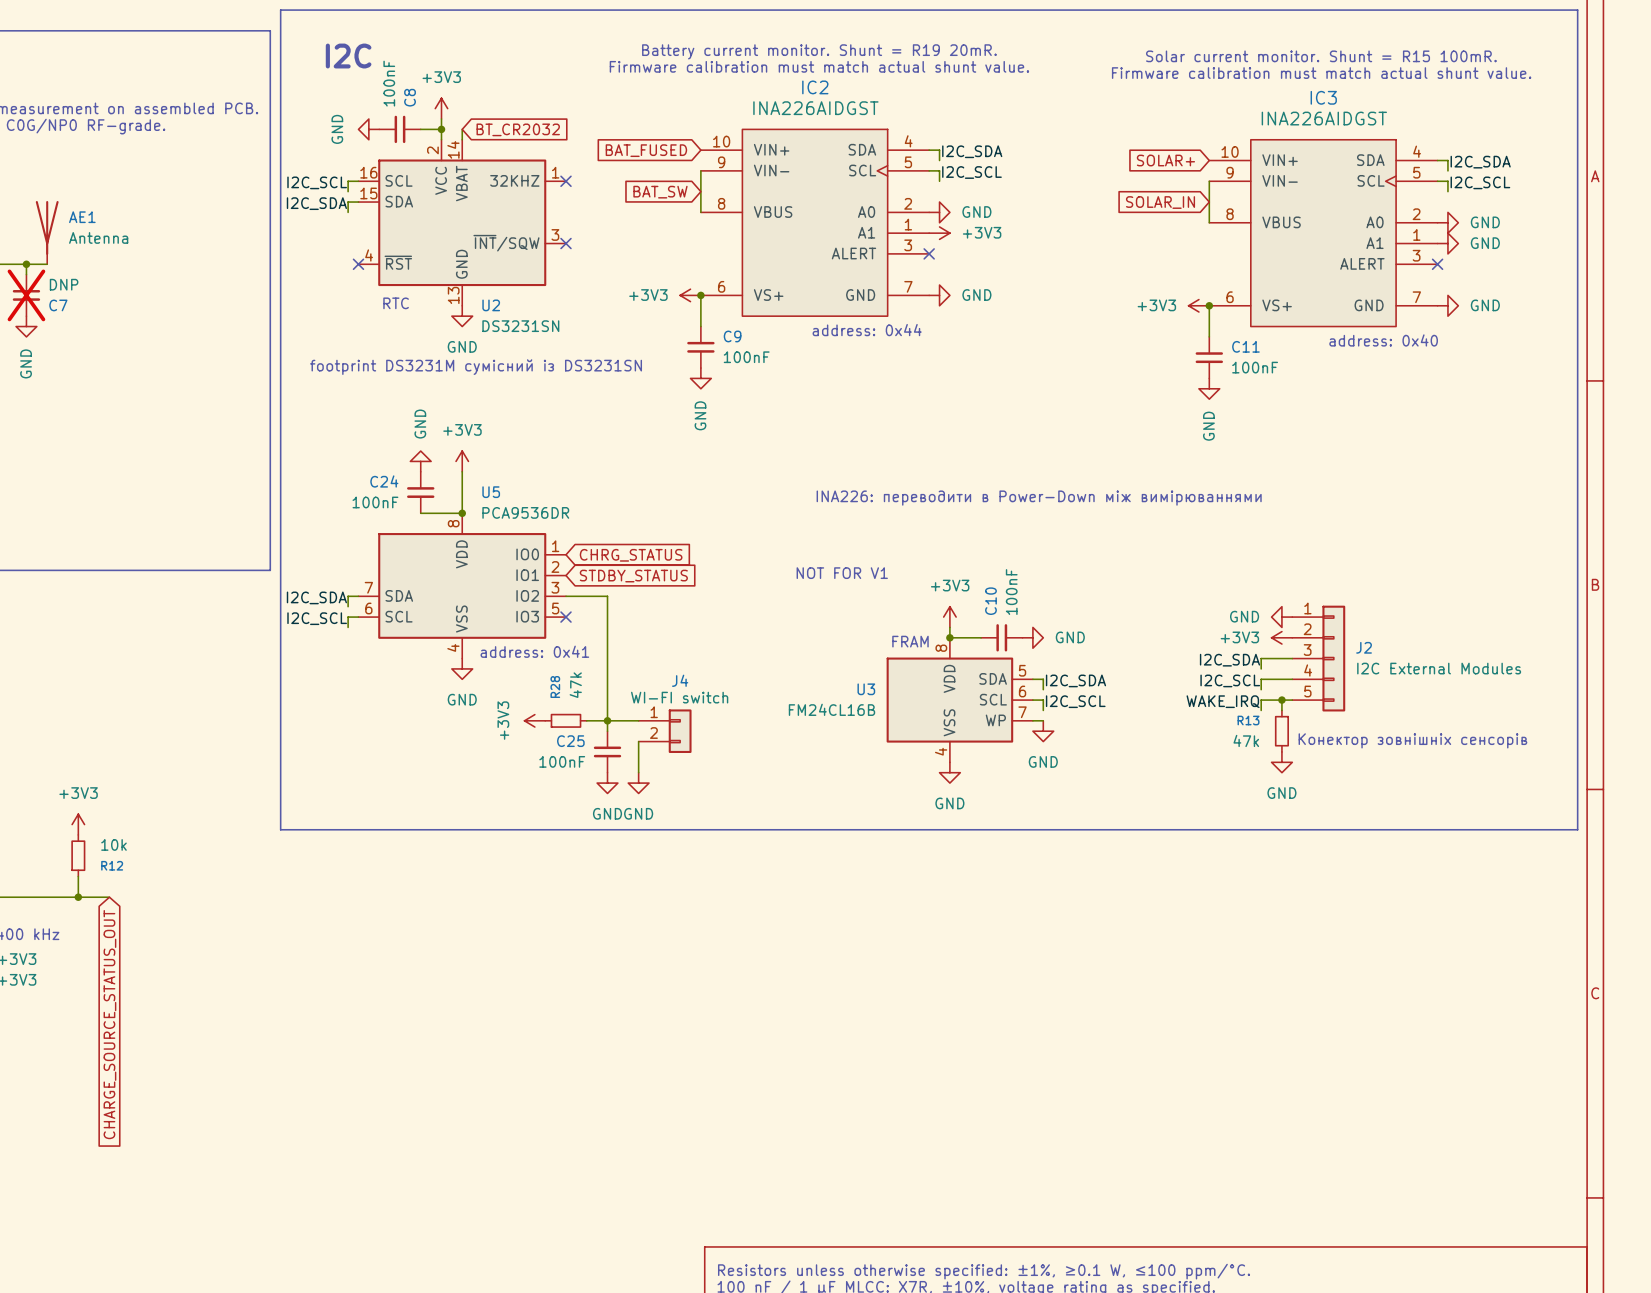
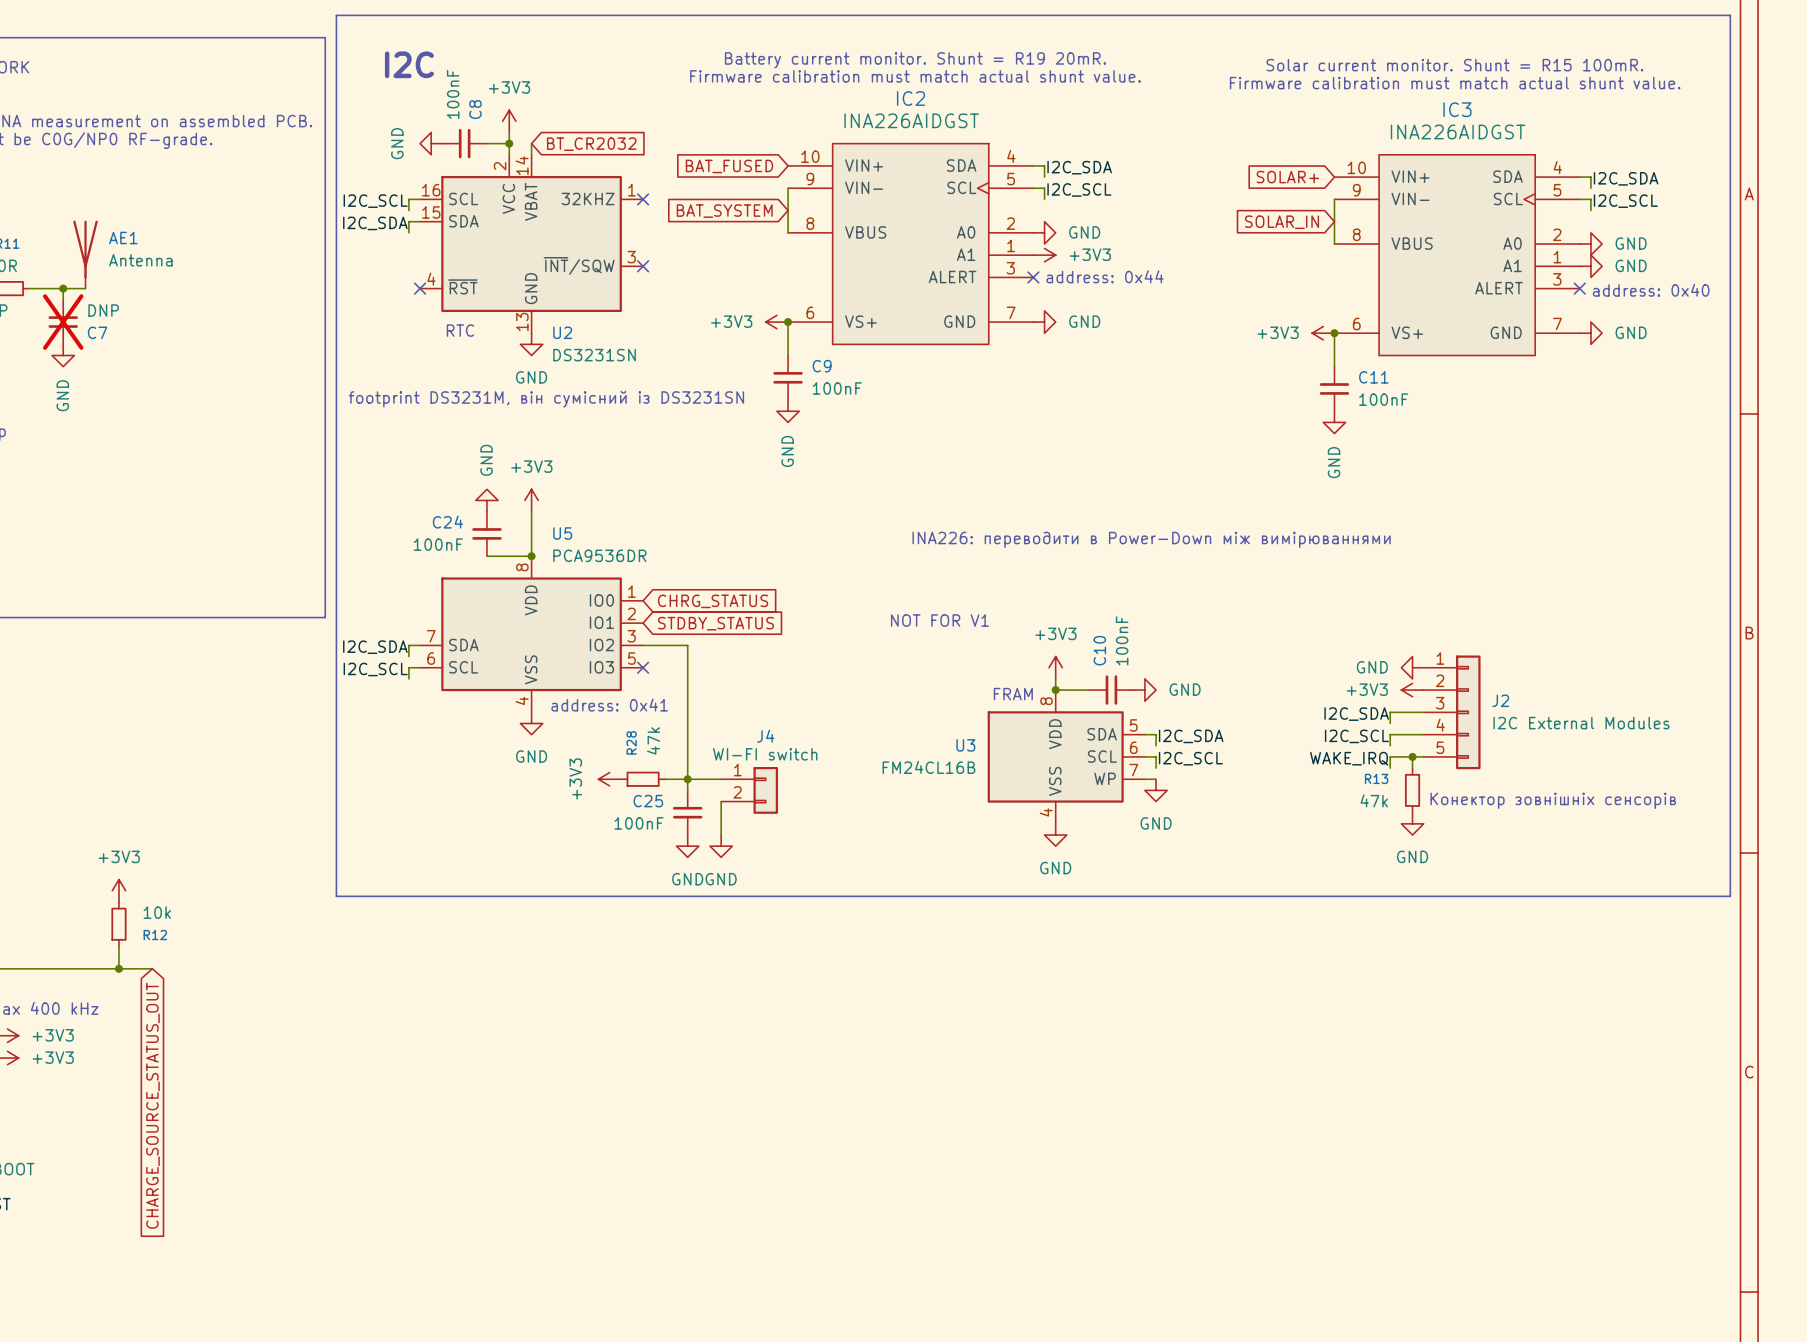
global label: BAT_SW (660, 192) -> BAT_SYSTEM (724, 211)
text position: address: 0x44 (867, 330) -> address: 0x44 (1105, 276)
text position: address: 0x40 (1383, 340) -> address: 0x40 (1651, 290)
text: footprint DS3231M сумісний із DS3231SN (476, 367) -> footprint DS3231M, він сумісний із DS3231SN (546, 399)

